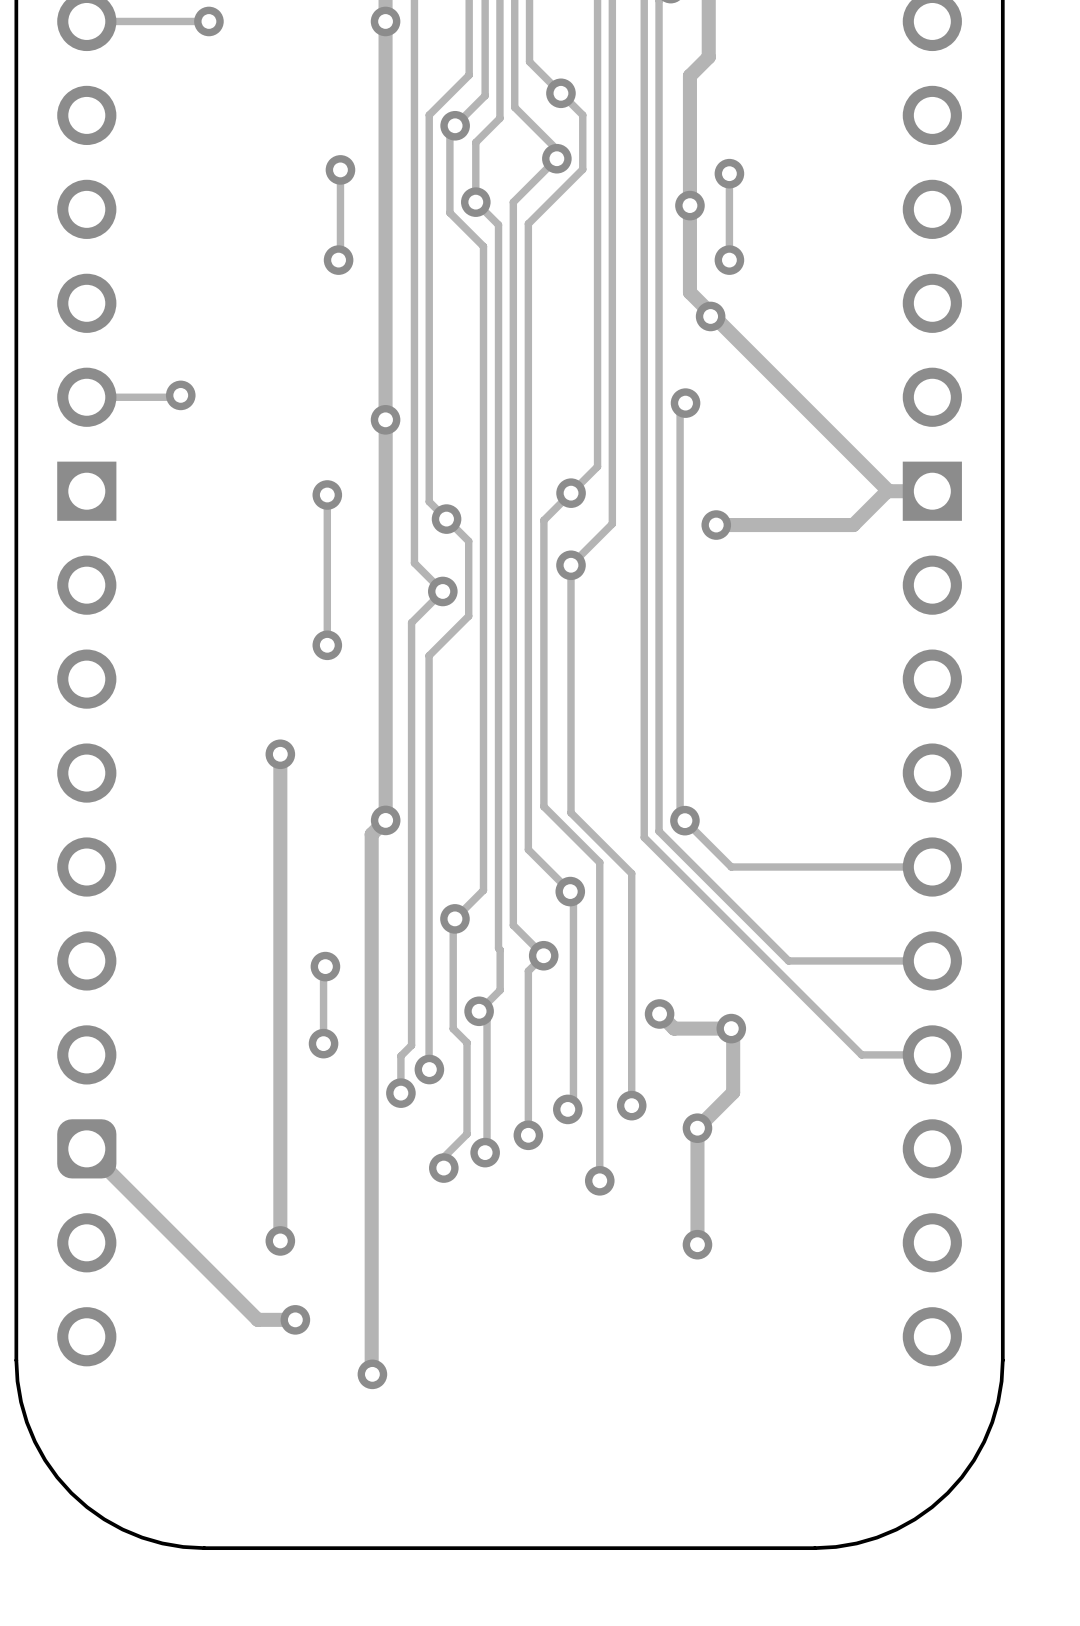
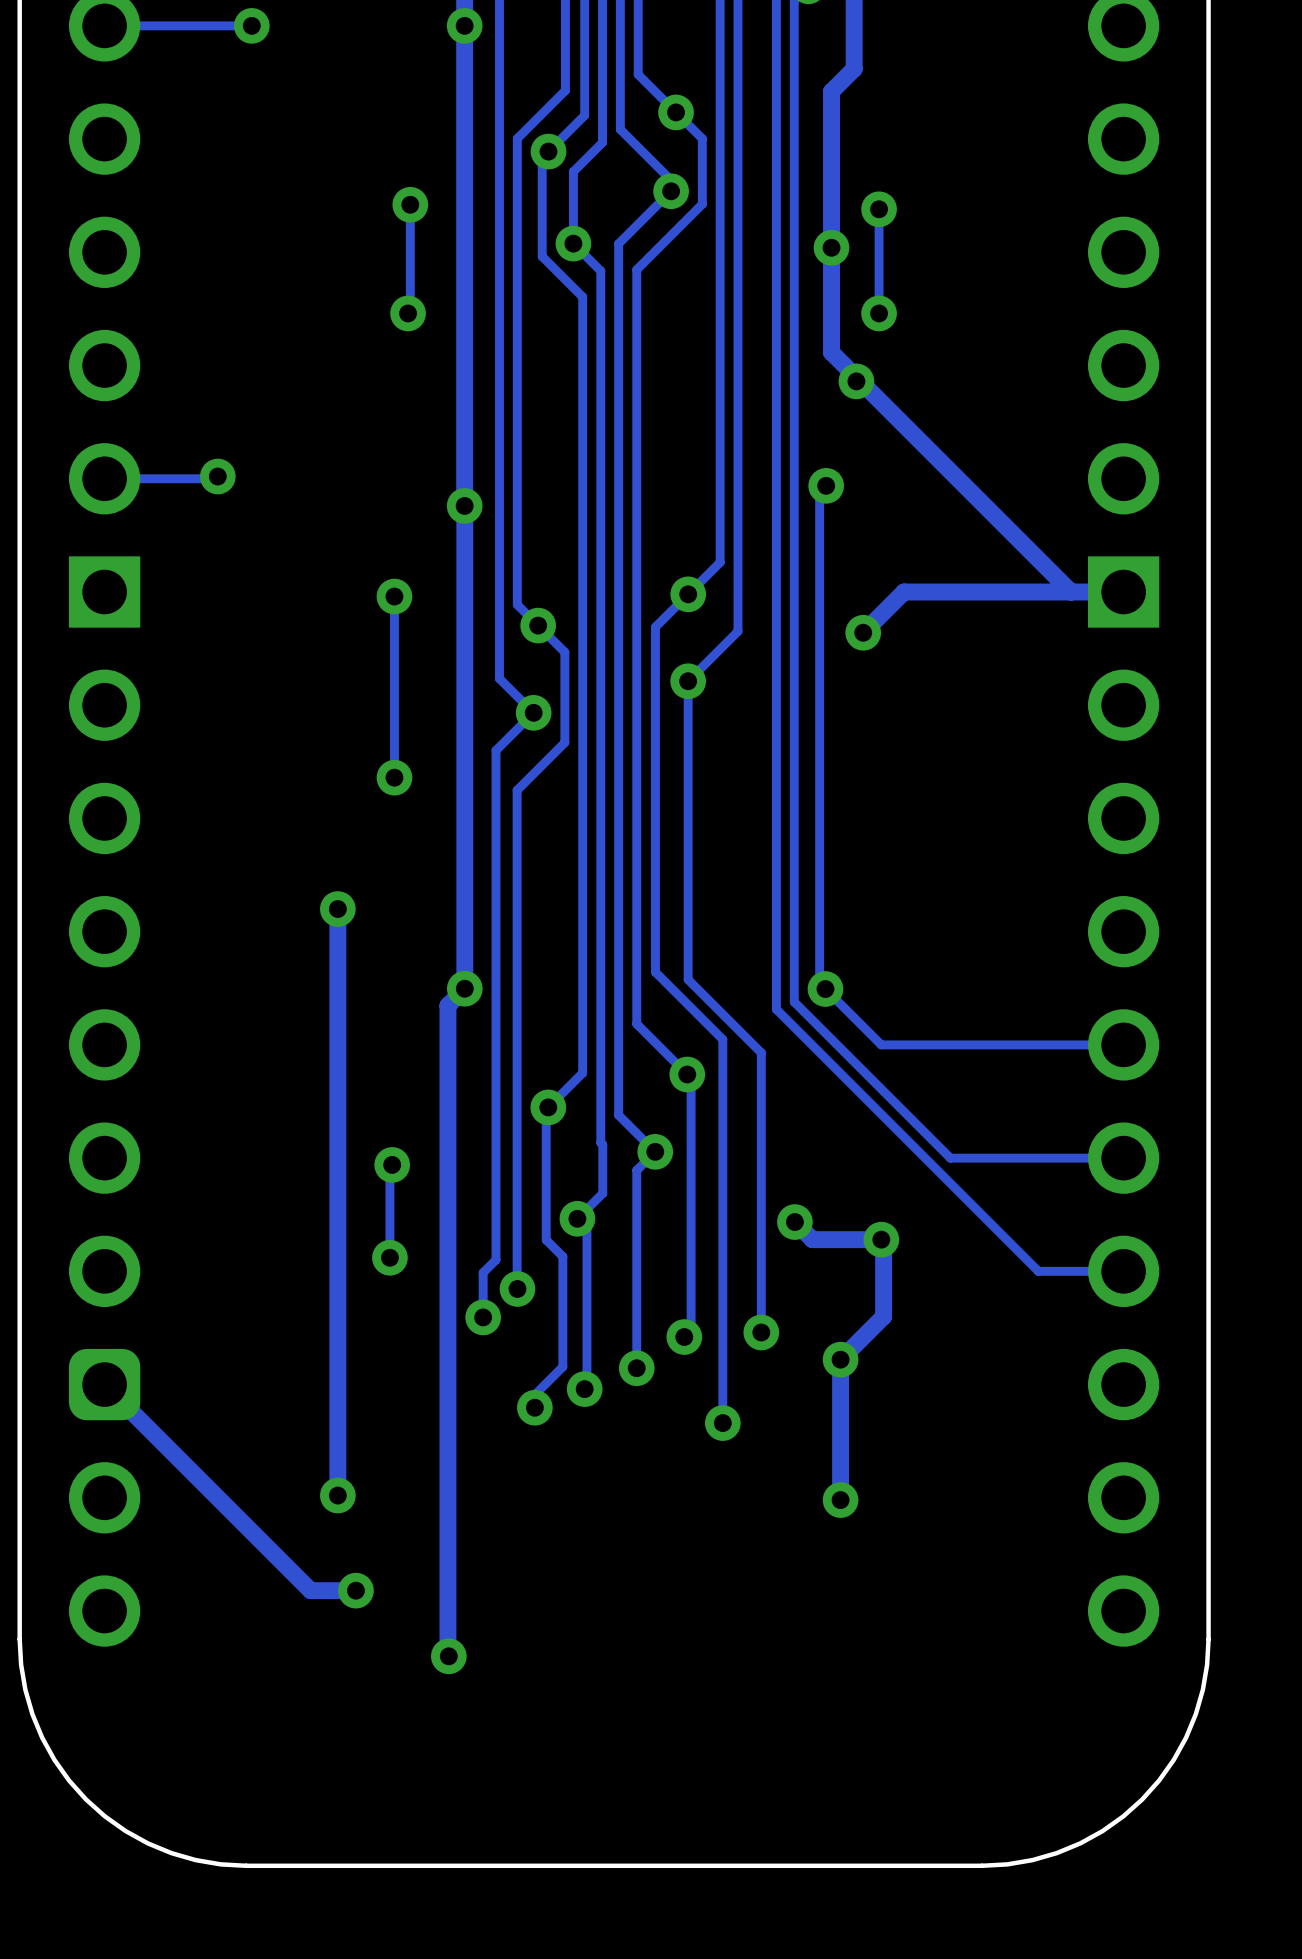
track: (887, 491) (853, 525) (716, 525) -> (1069, 592) (903, 592) (863, 632)

